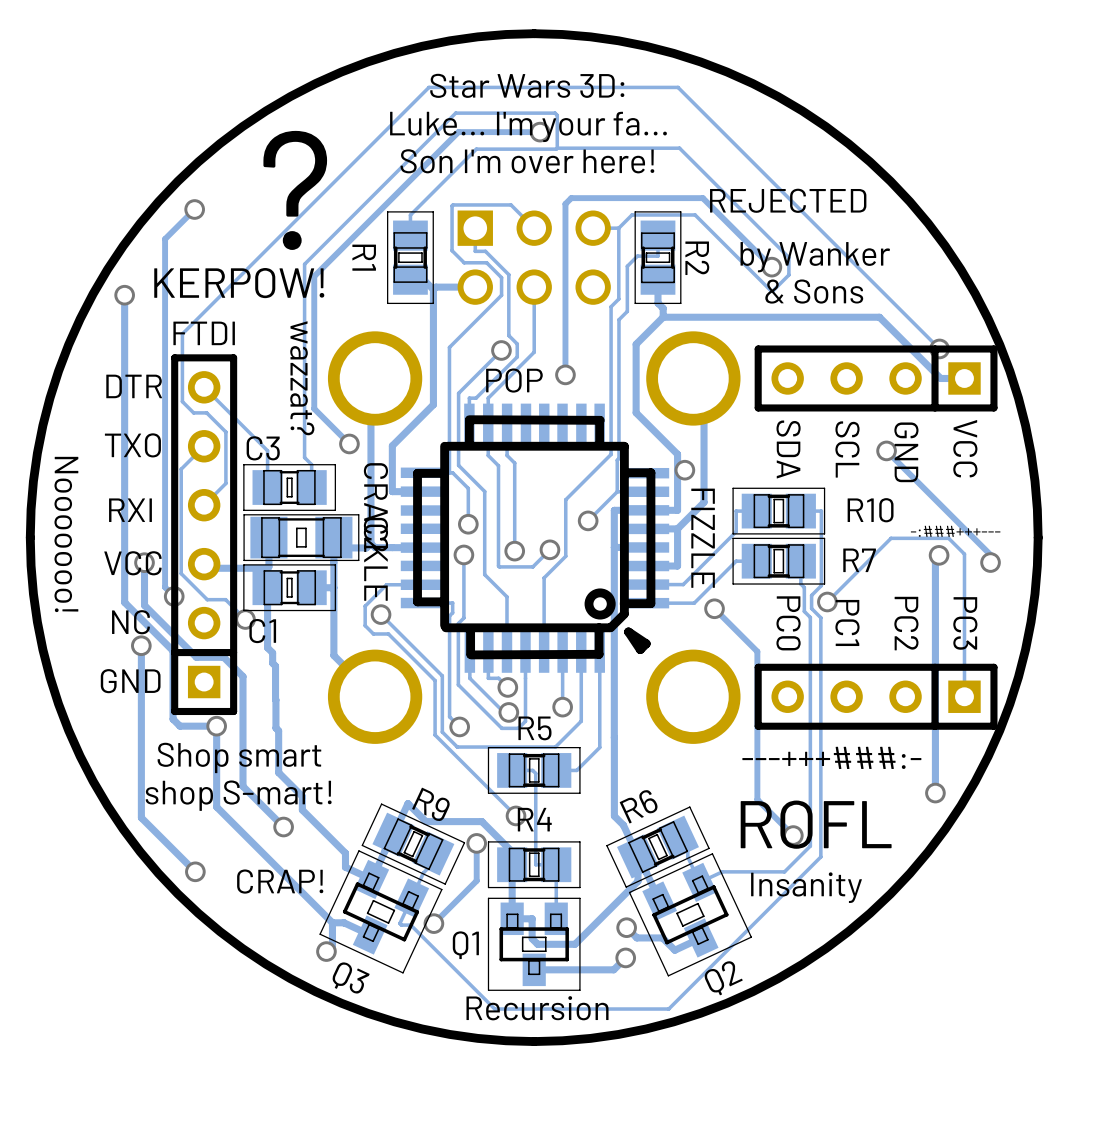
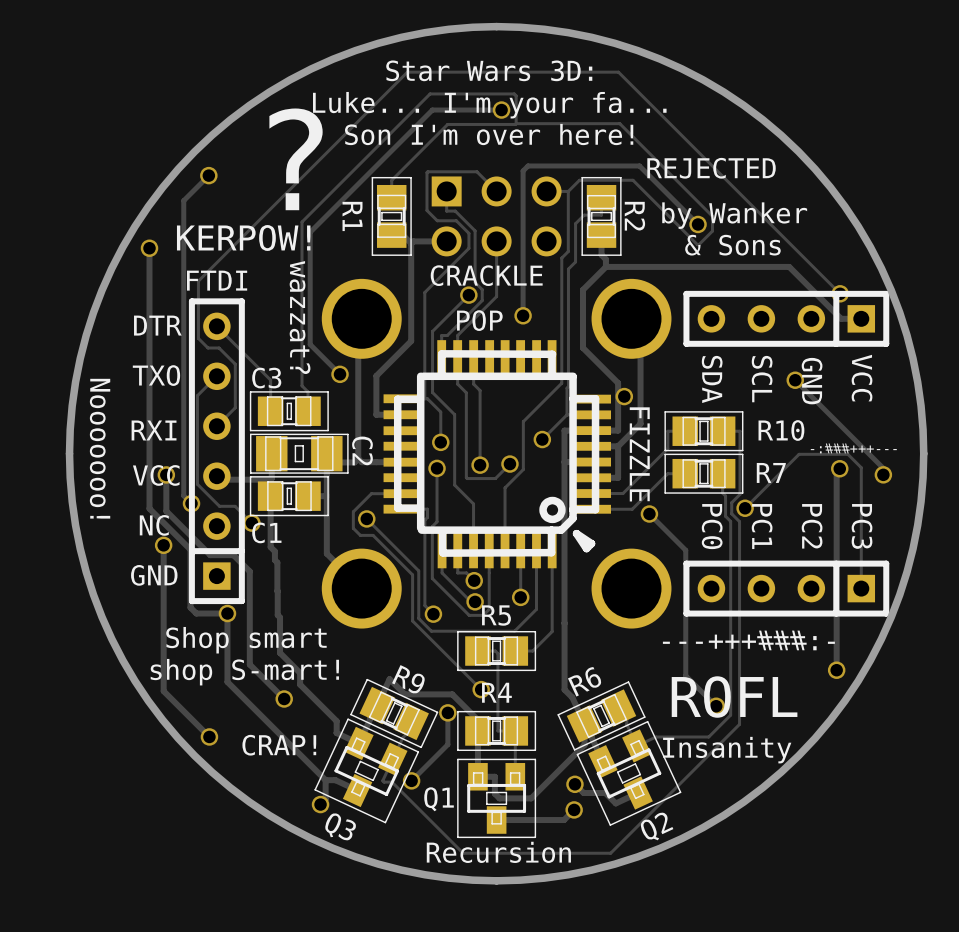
text rotation: 0° (375, 531) -> 90° counterclockwise (486, 275)
text position: CRACKLE (375, 531) -> CRACKLE (486, 275)

